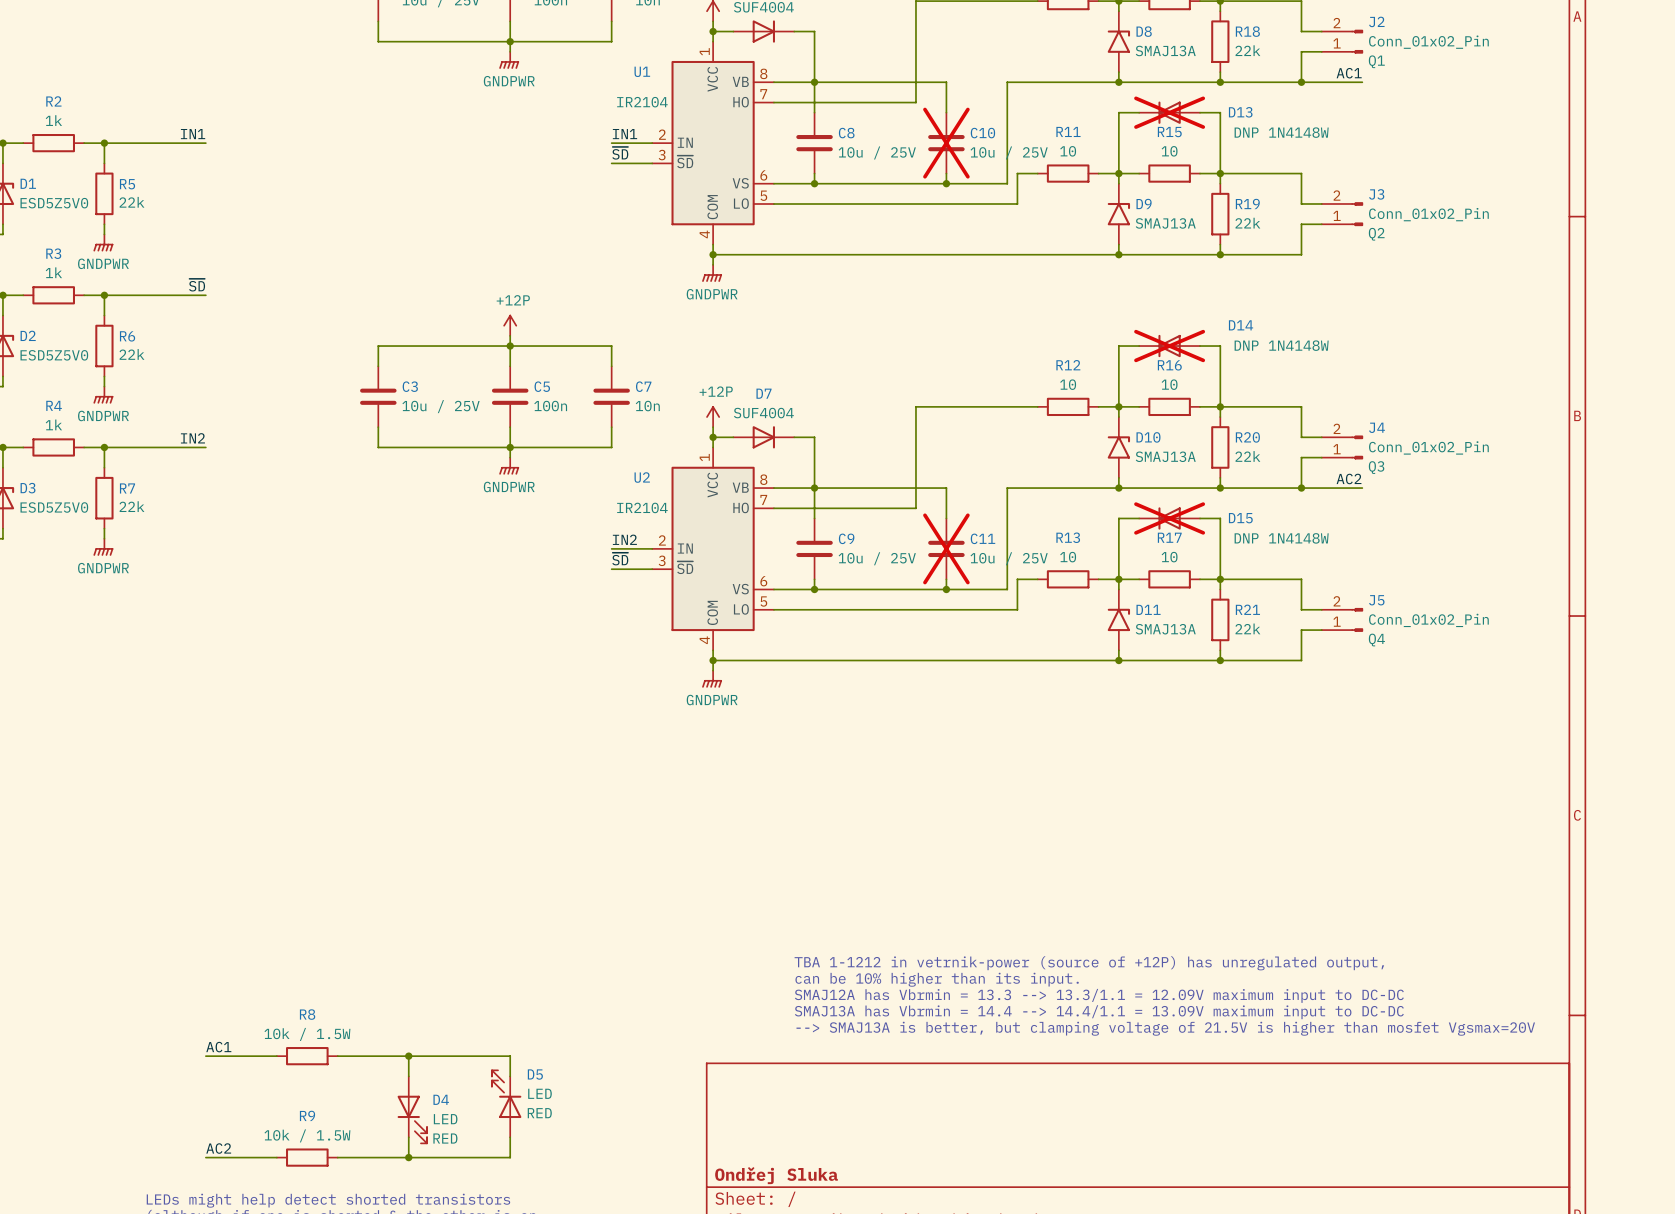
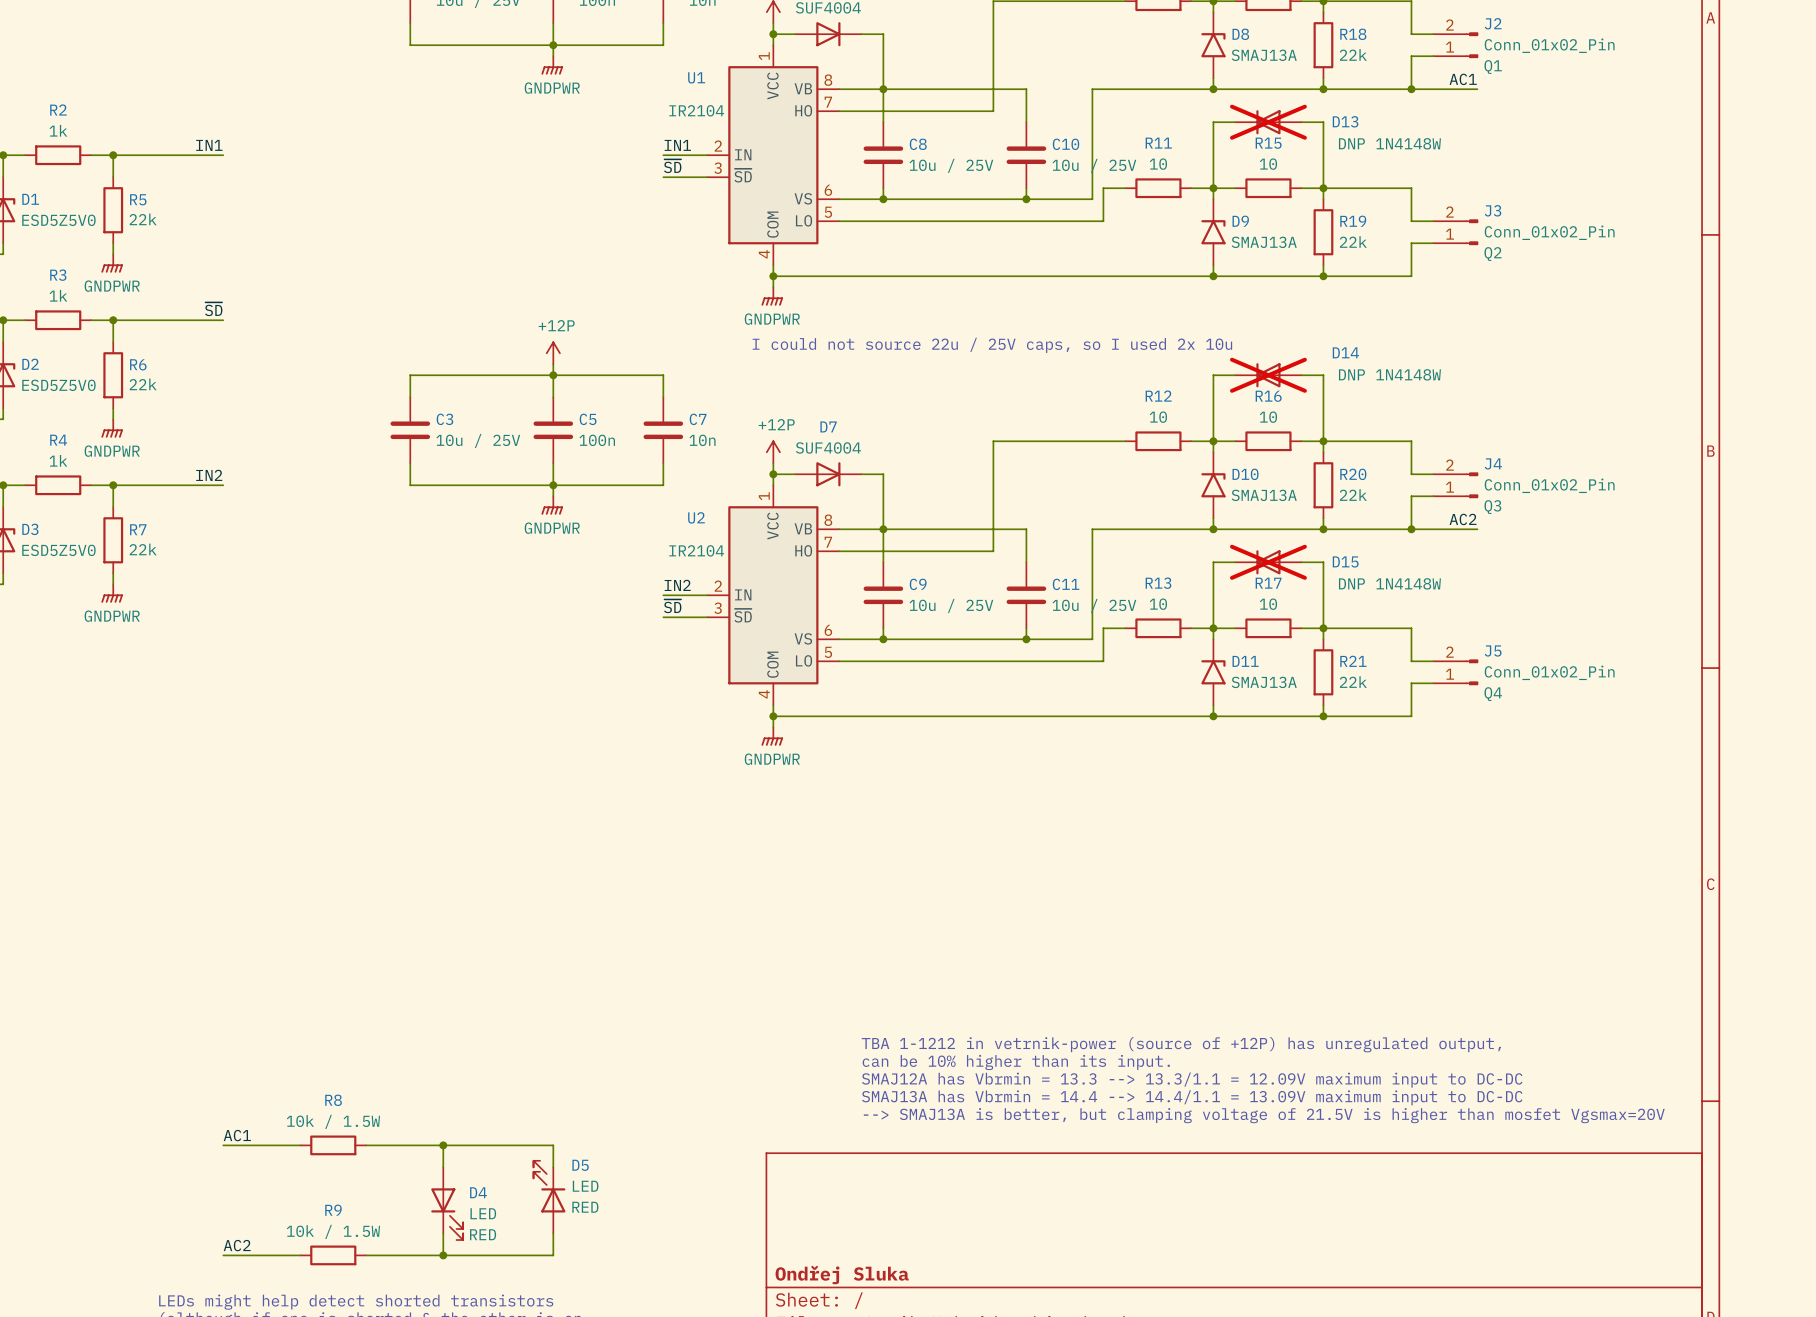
C10 do-not-place cross: (946, 143) -> none
text: none -> I could not source 22u / 25V caps, so I used 2x 10u (992, 345)
C11 do-not-place cross: (946, 548) -> none

